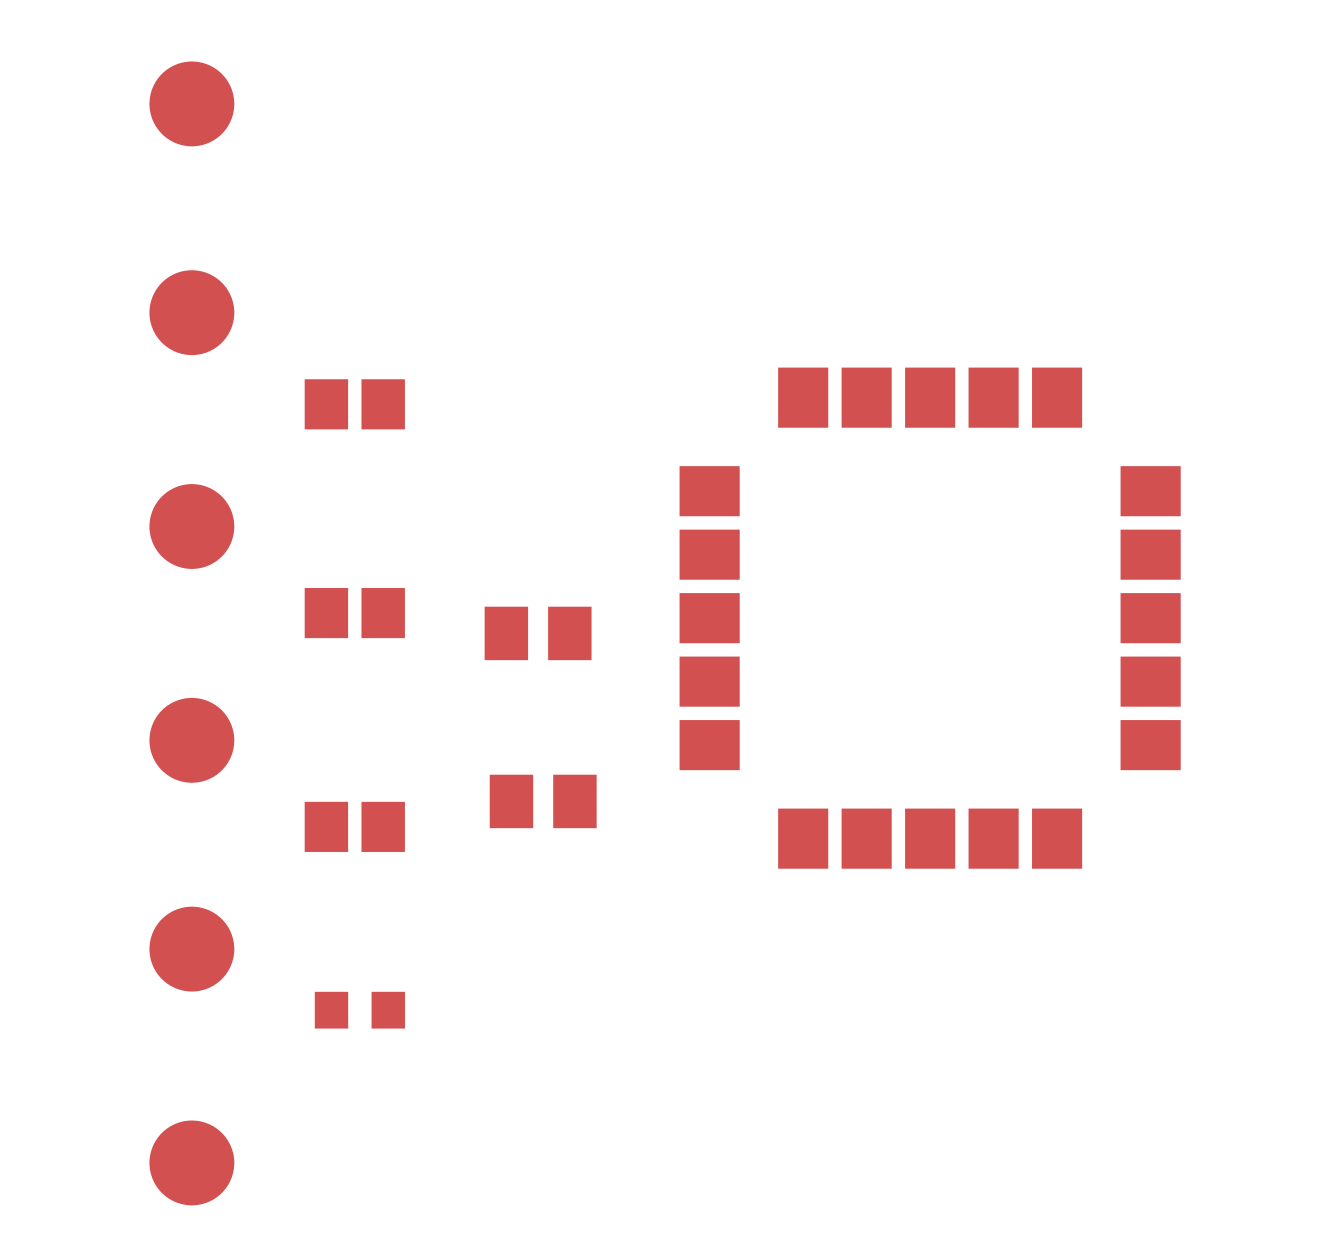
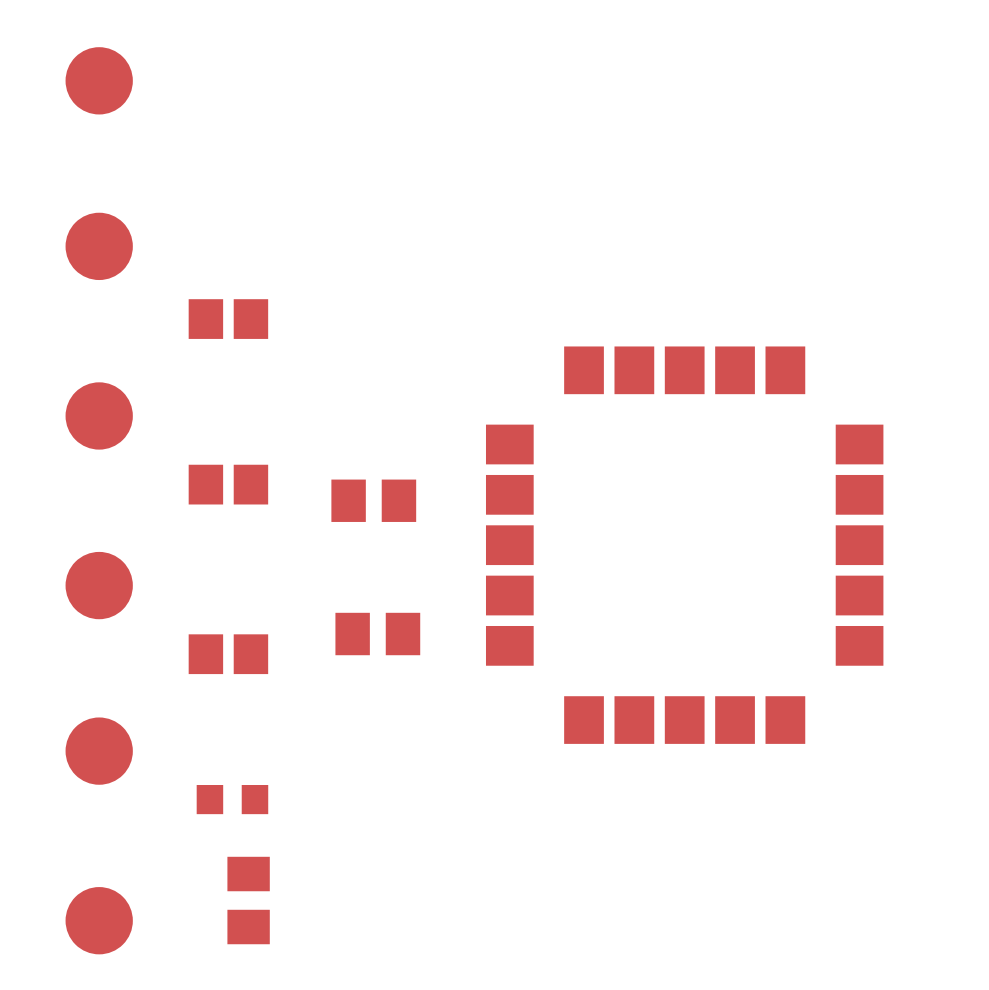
part position: (930, 618) -> (684, 545)
part: none -> (248, 900)

